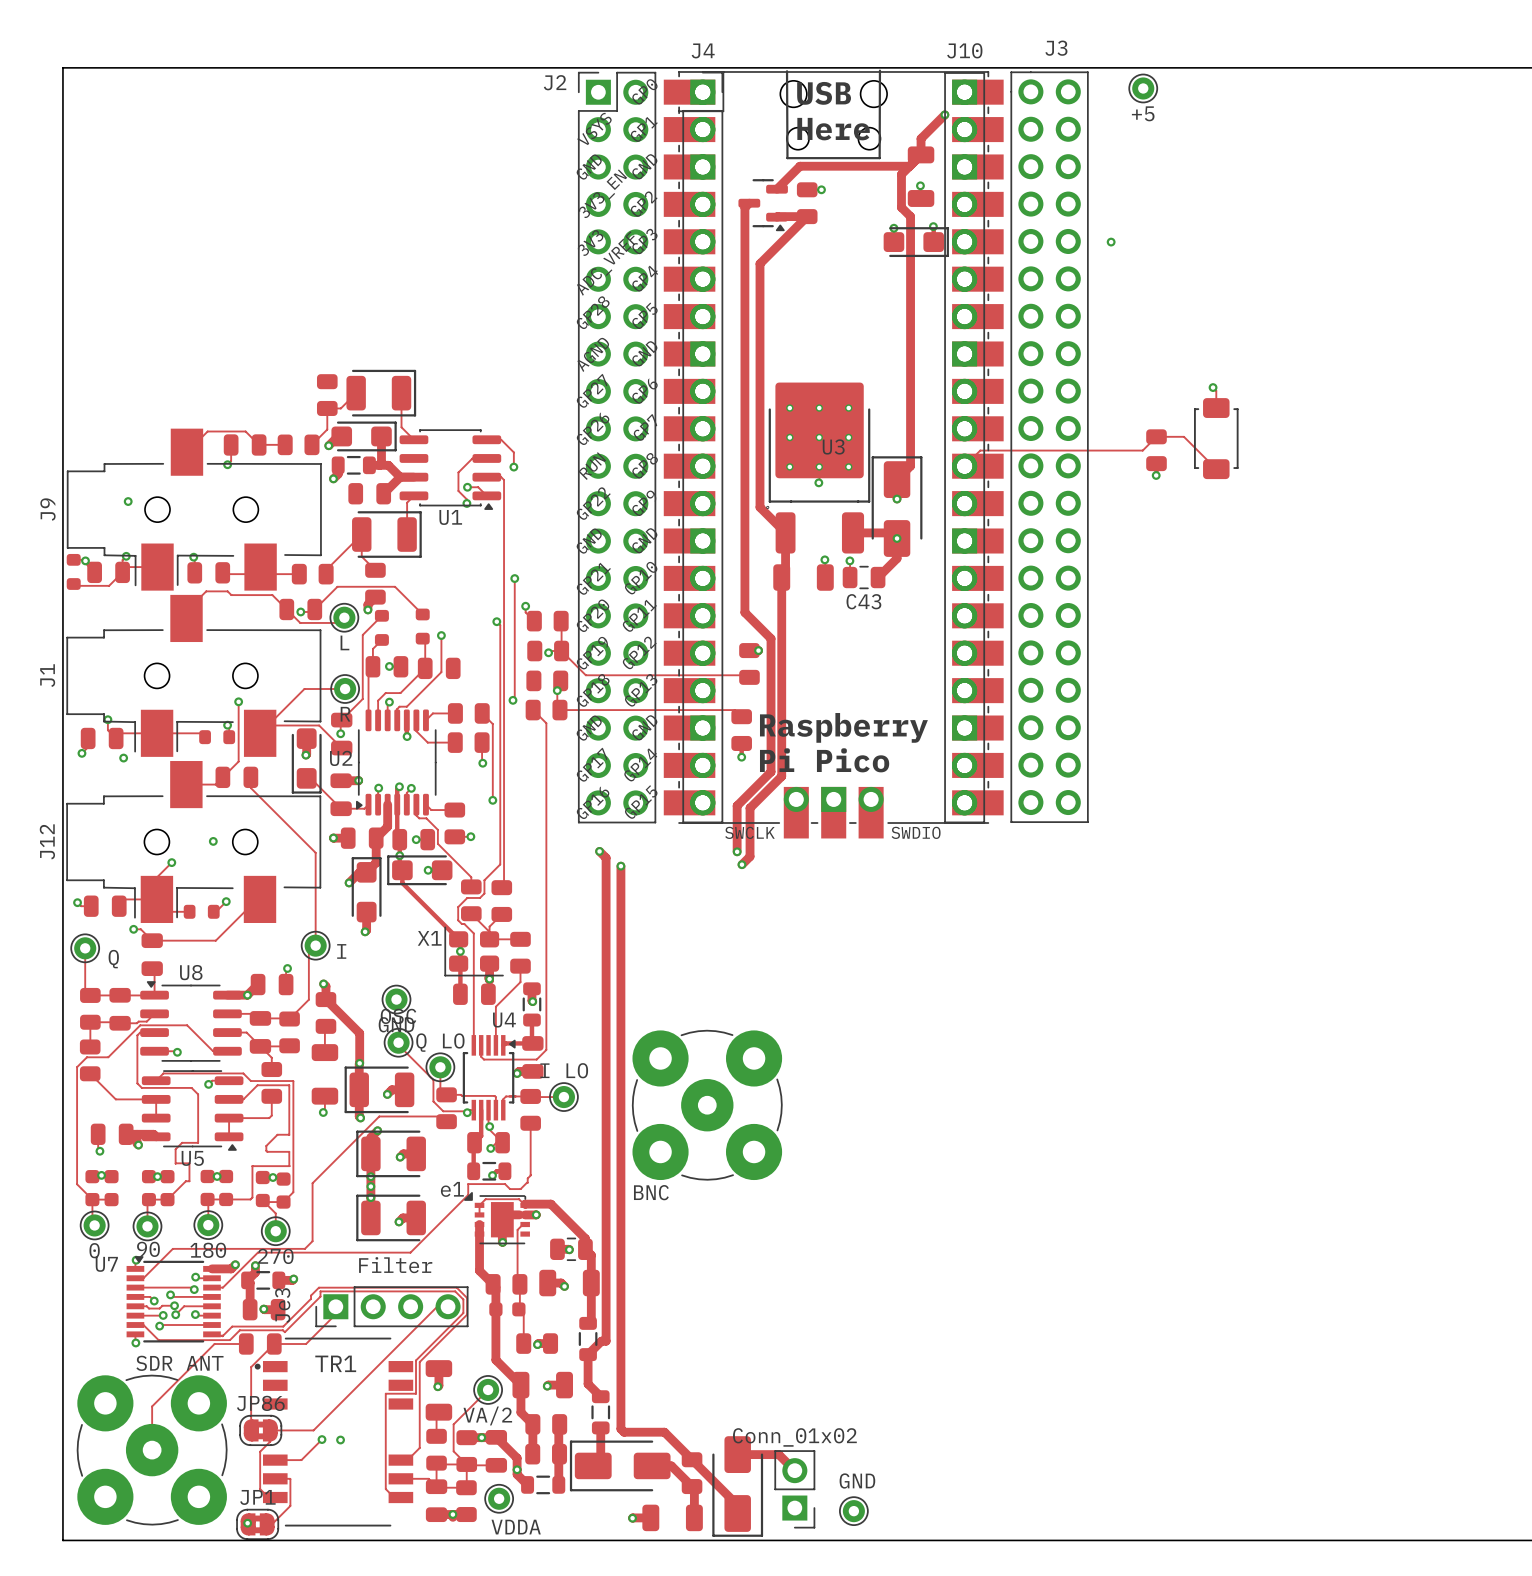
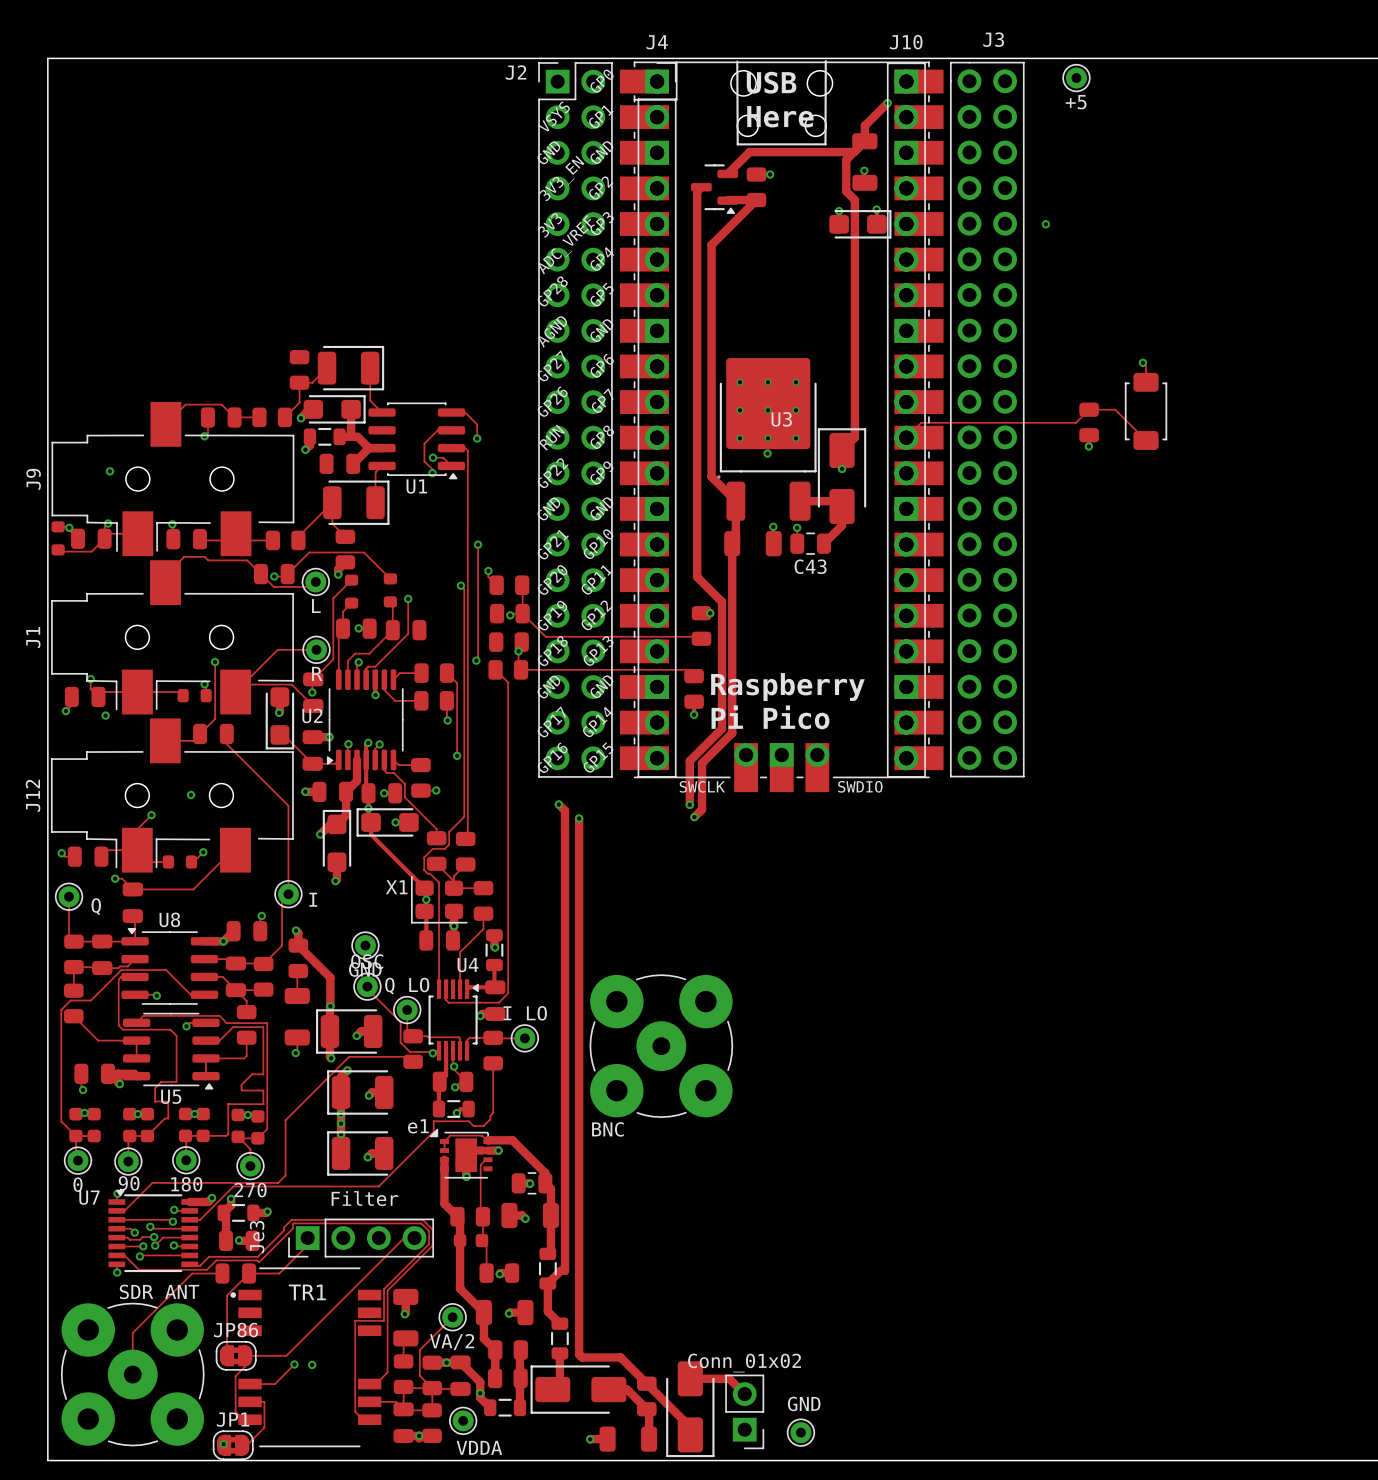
via: (897, 538) -> none

